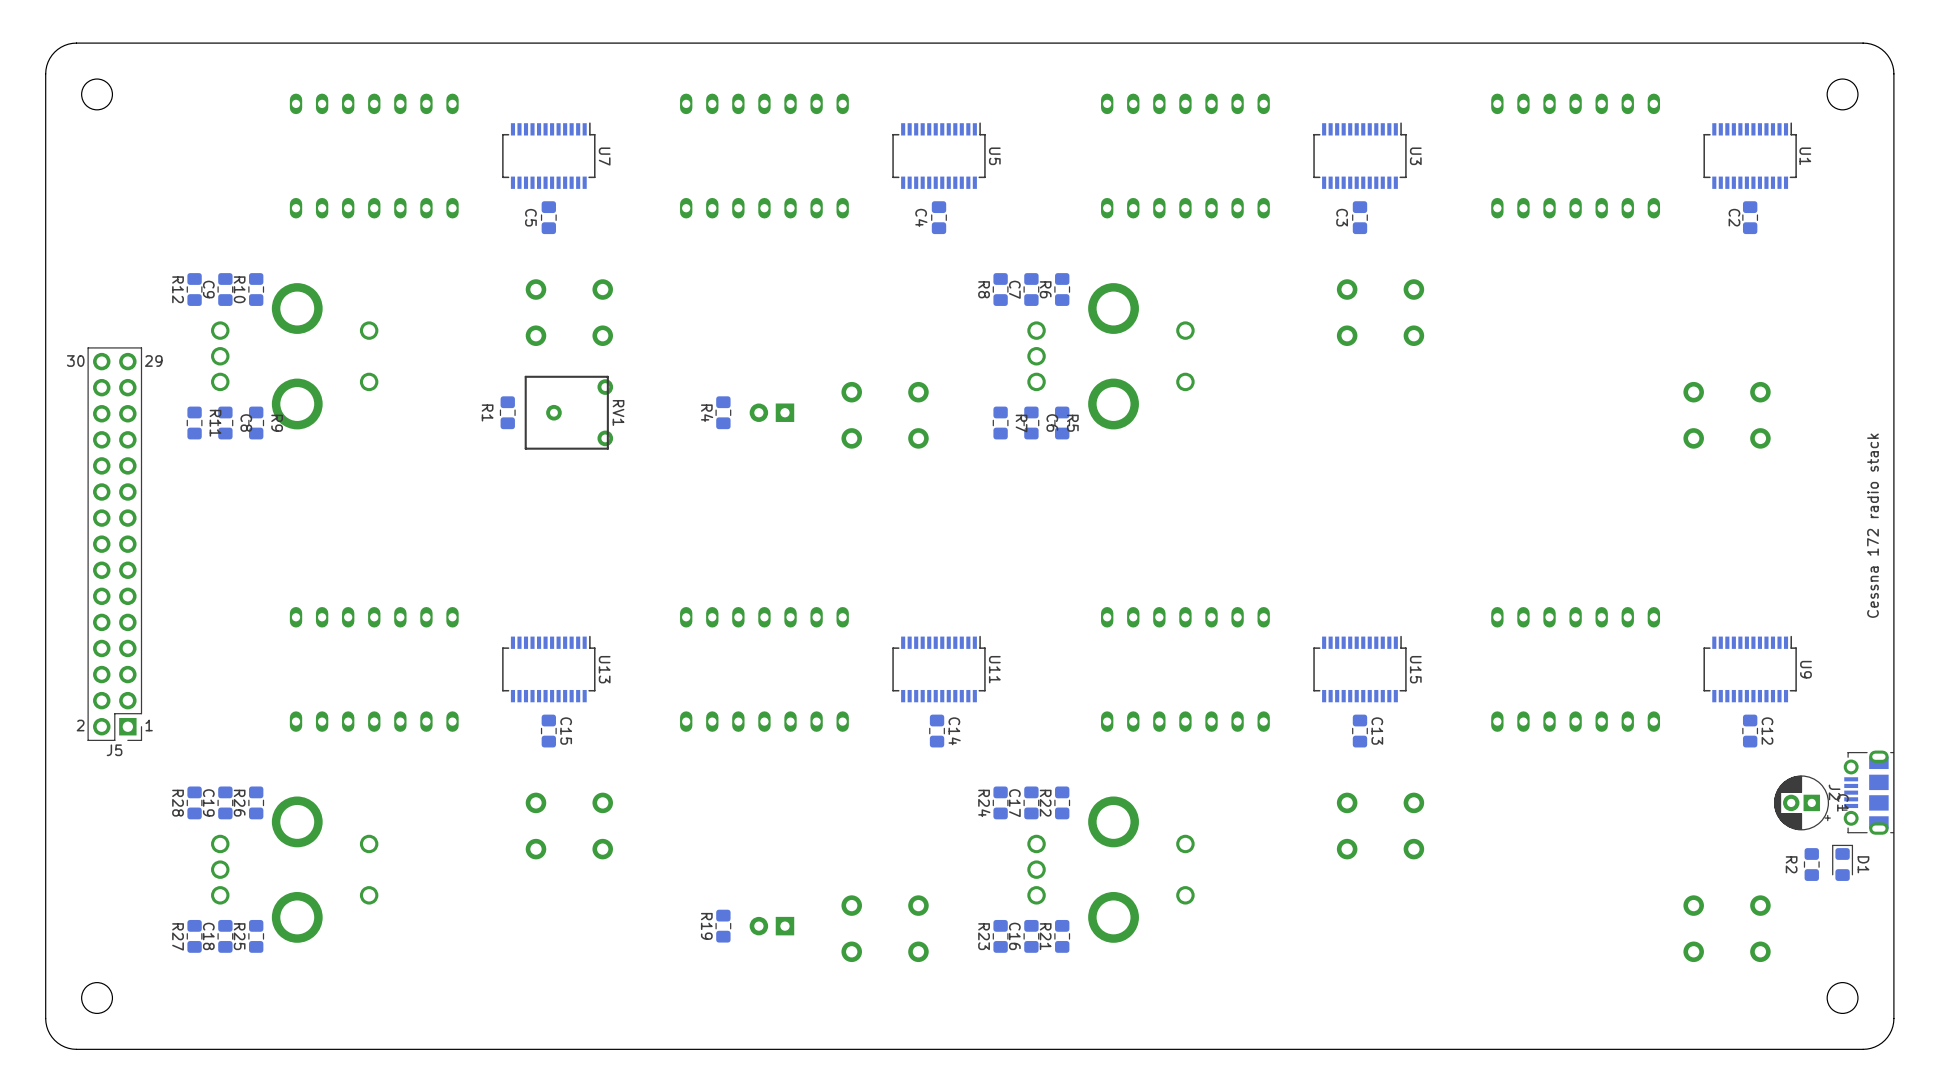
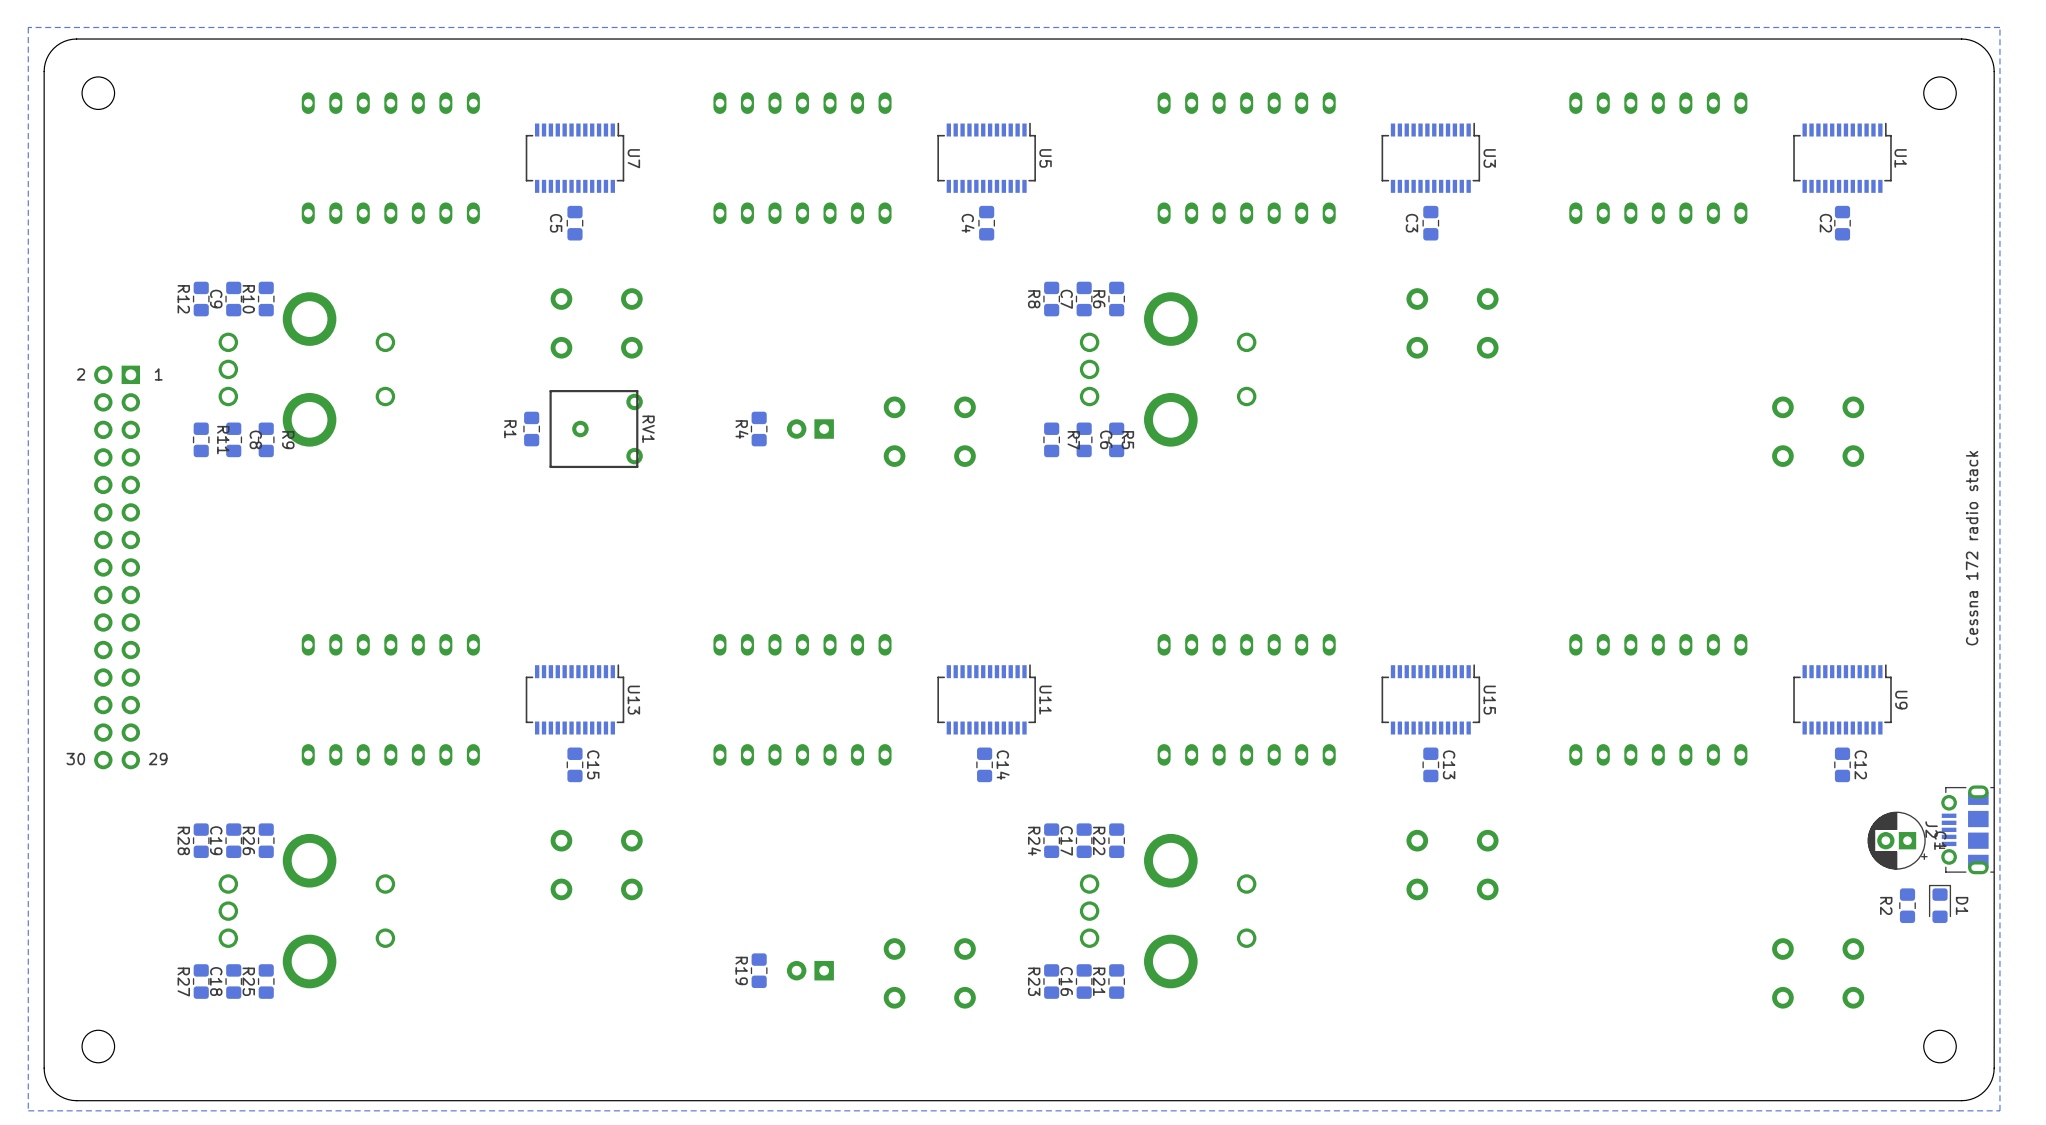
zone outline: none -> (1999, 27) (1999, 1110) (28, 1110) (28, 27) (1999, 27)
text: 30 (75, 361) -> 2 (80, 374)
text: 29 (153, 361) -> 1 (158, 374)
J5 side: bottom (114, 544) -> top (117, 567)
text: 2 (80, 725) -> 30 (75, 759)
text: 1 (149, 725) -> 29 (158, 759)

